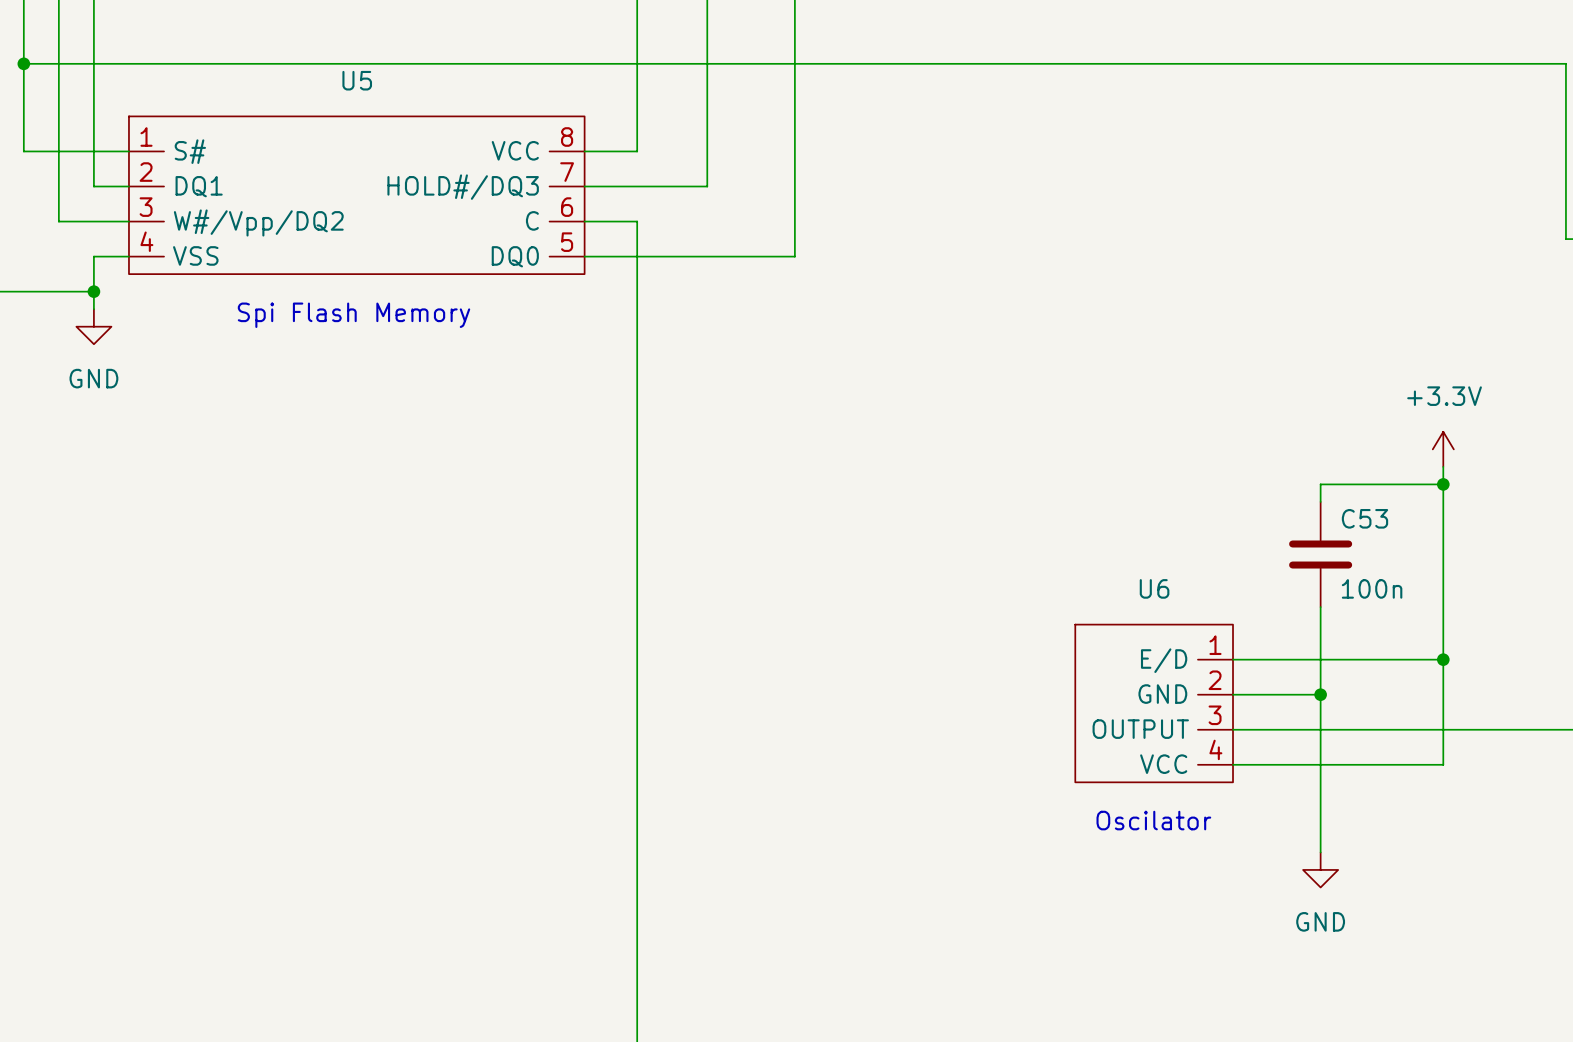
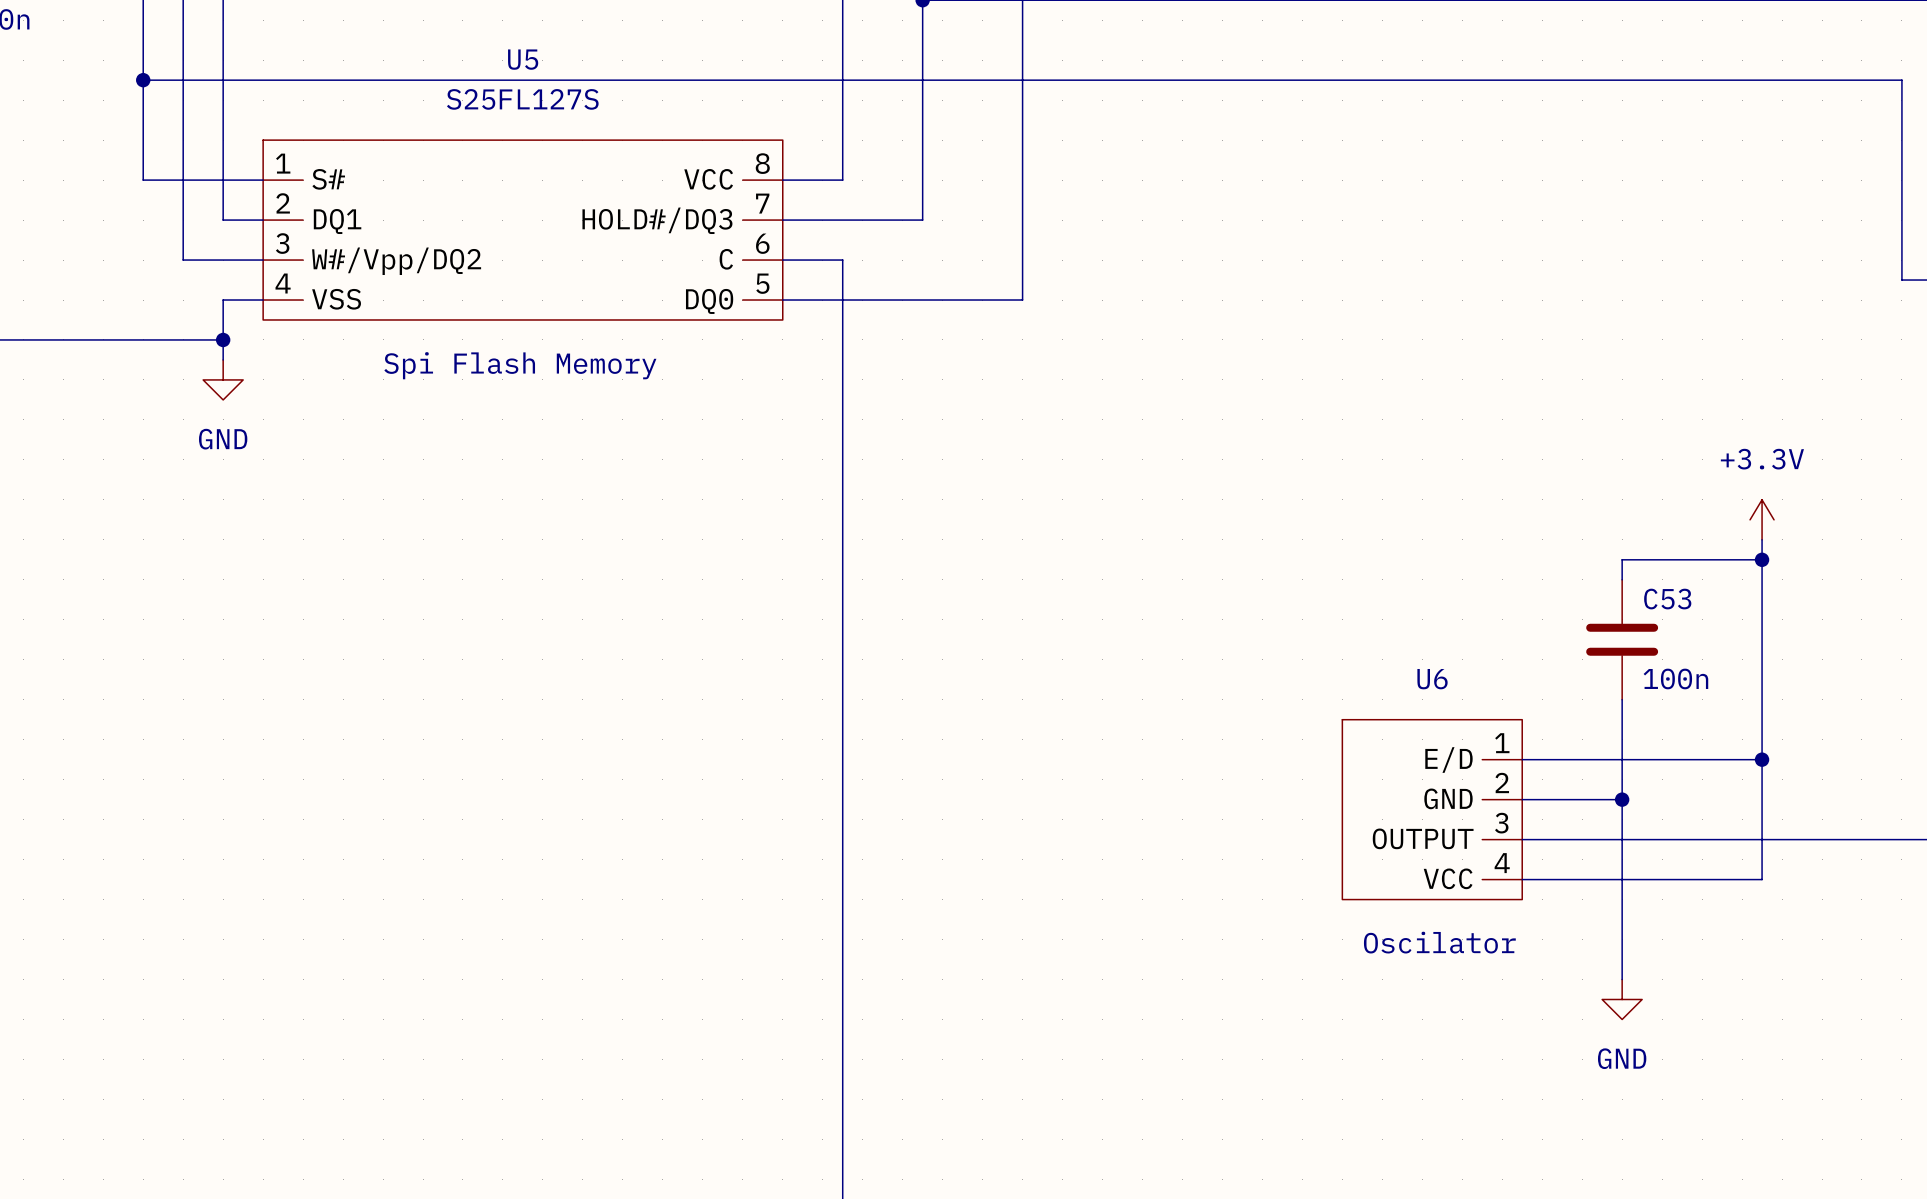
U5 value: none -> S25FL127S (522, 99)
U5 name position: U5 (357, 80) -> U5 (523, 59)

